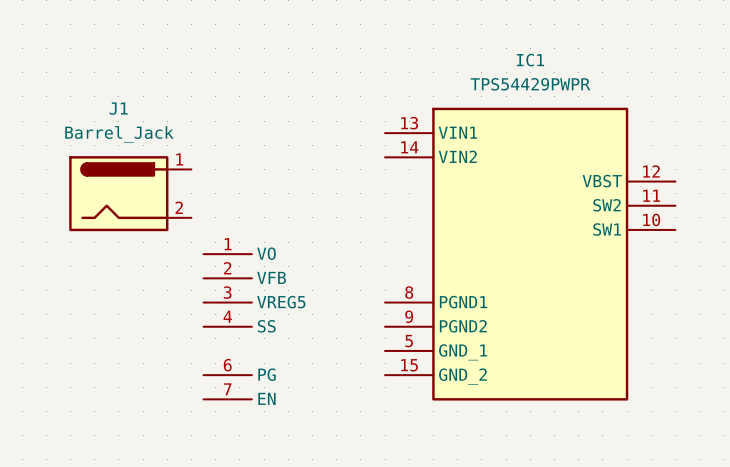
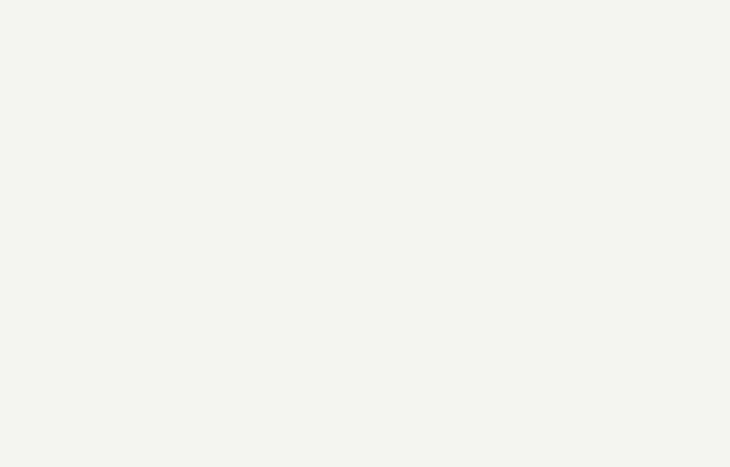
J1: Barrel_Jack (130, 193) -> none
IC1: TPS54429PWPR (439, 254) -> none

